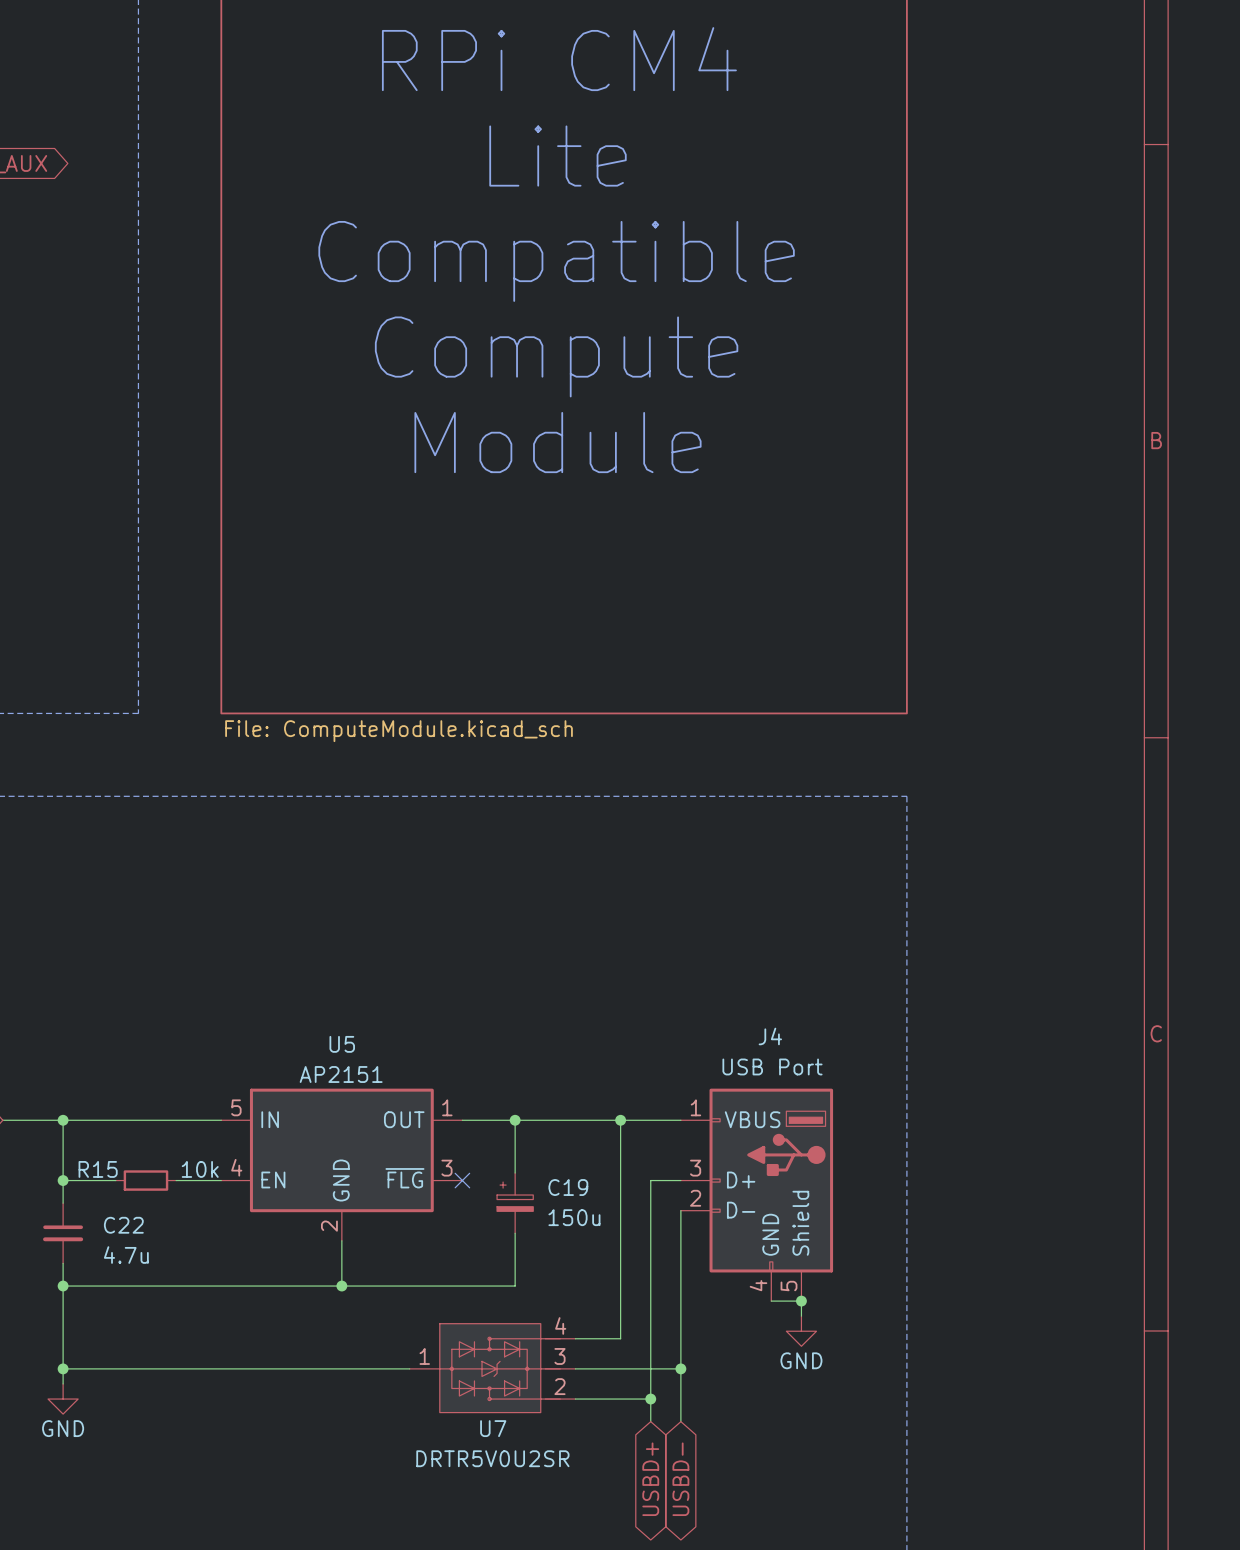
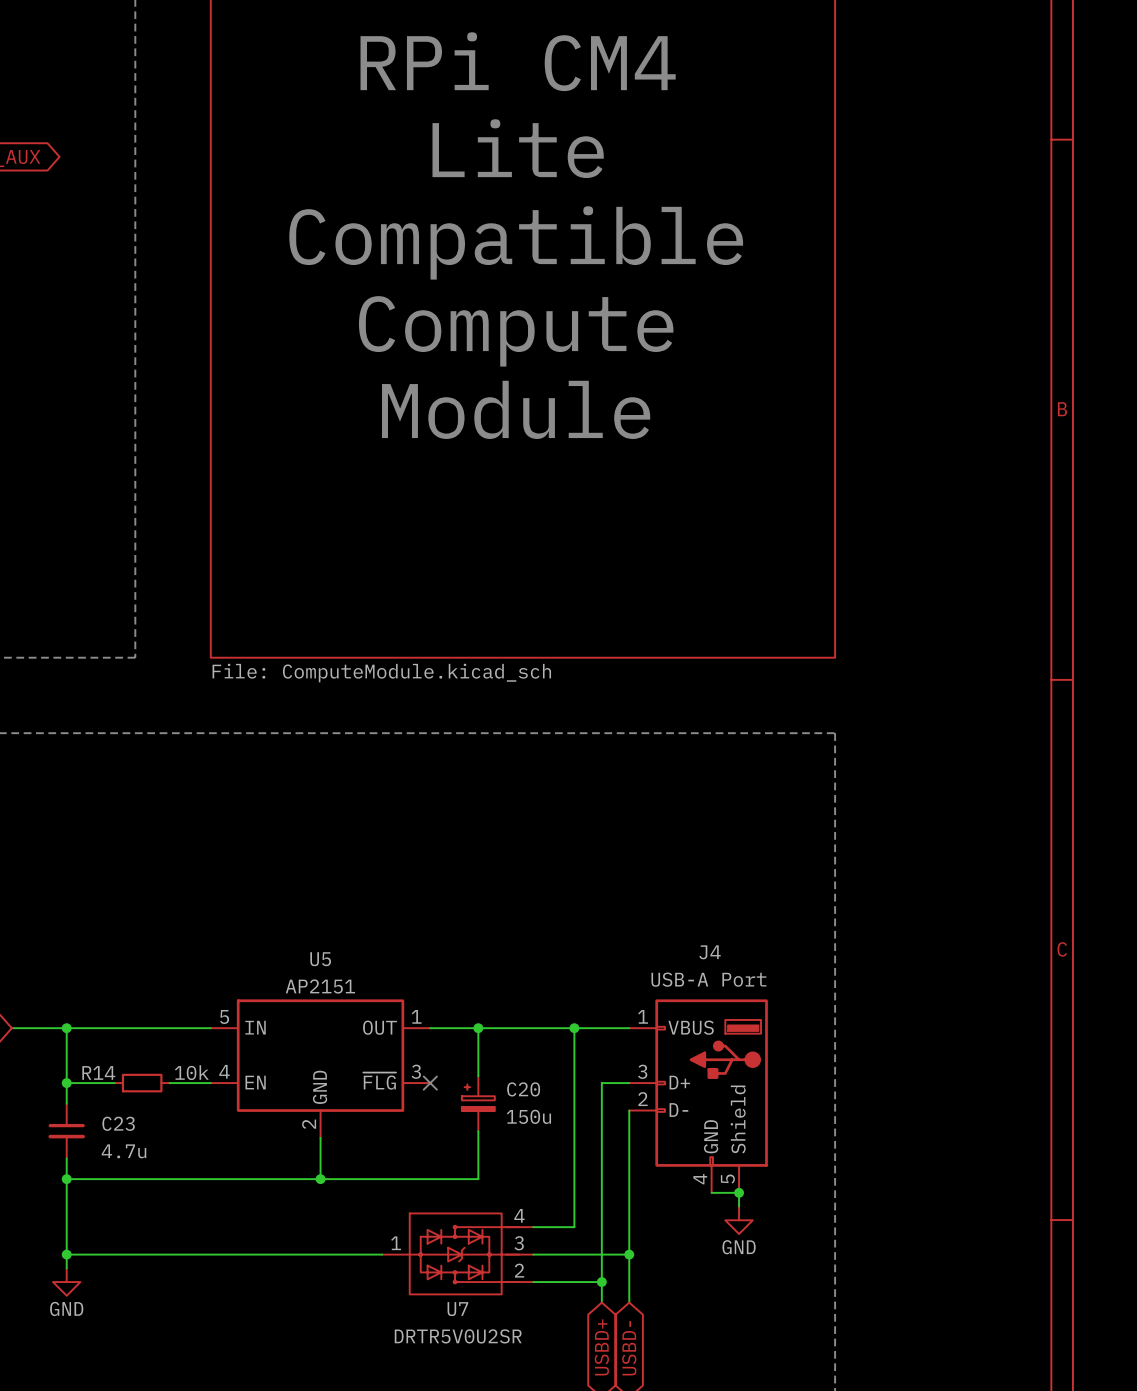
J4 value: USB Port (772, 1066) -> USB-A Port (708, 979)
R15 name: R15 (98, 1169) -> R14 (98, 1072)
C19 name: C19 (568, 1187) -> C20 (523, 1089)
C22 name: C22 (123, 1225) -> C23 (118, 1123)

